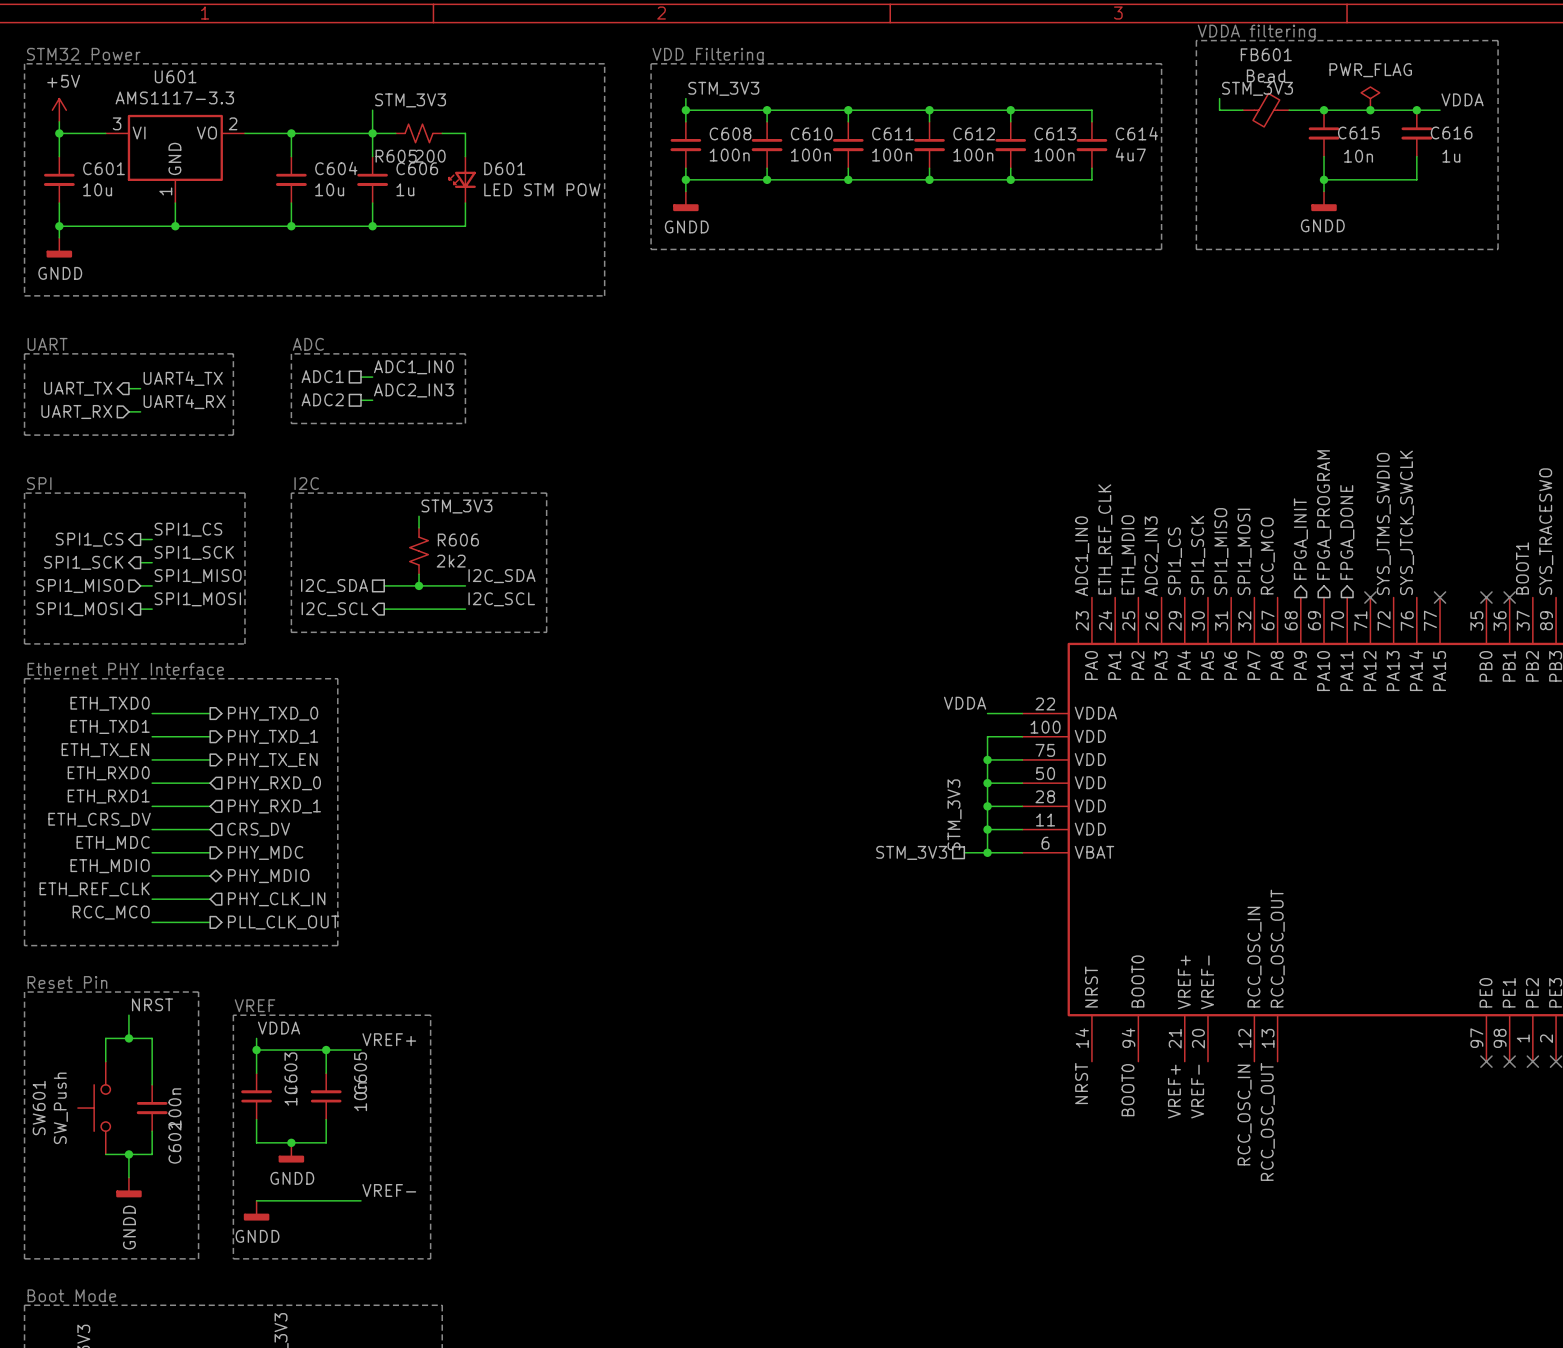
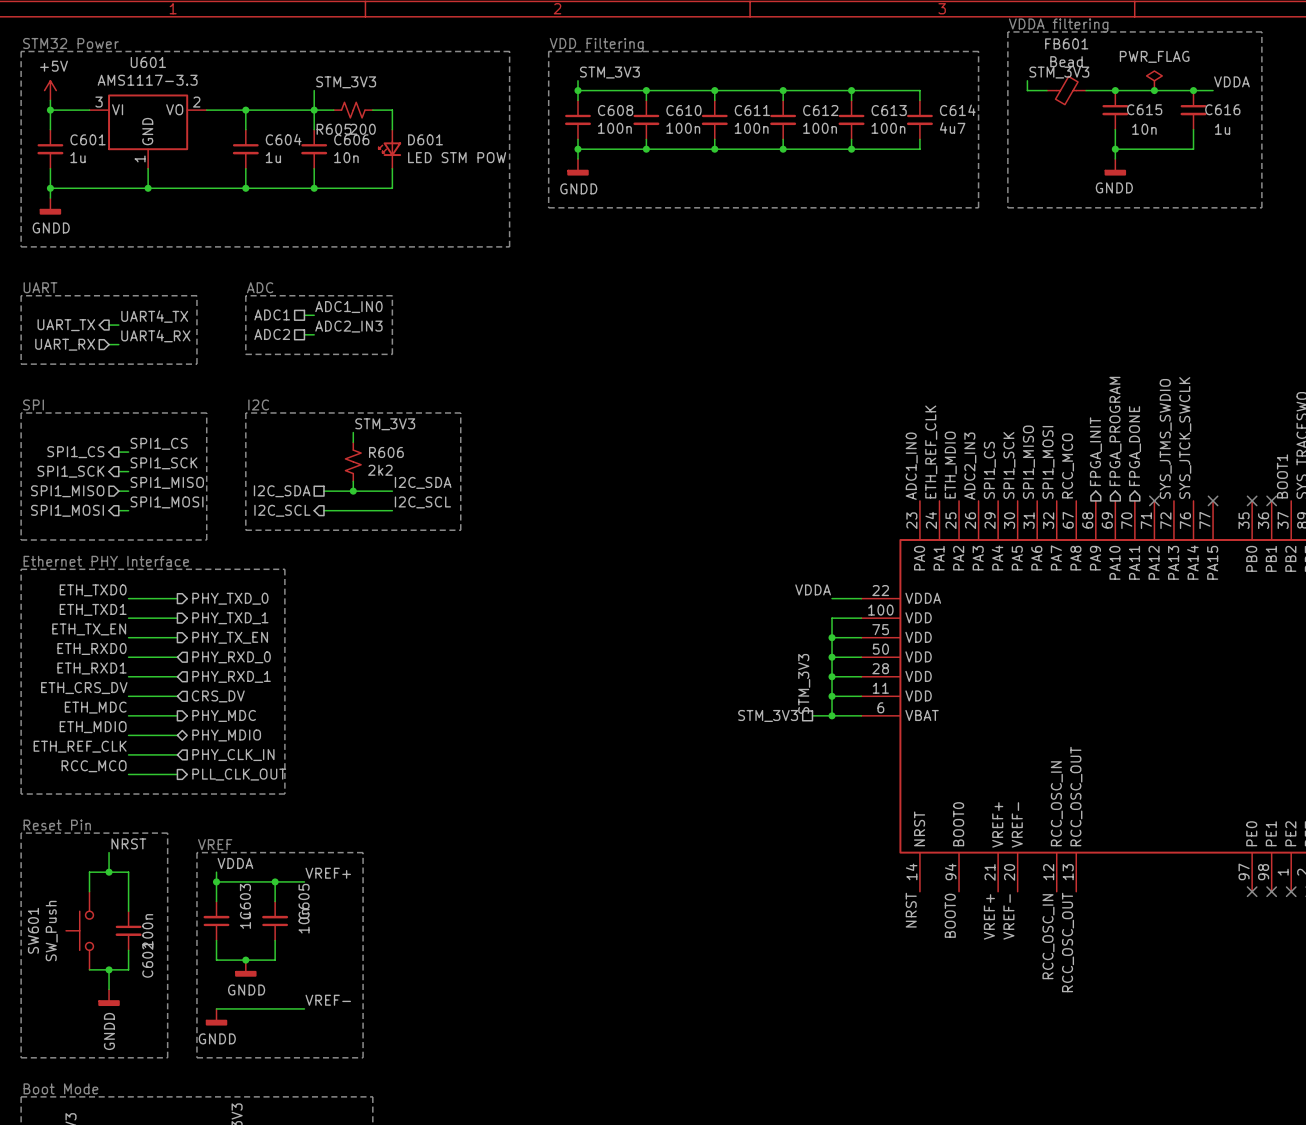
C601 value: 10u (97, 189) -> 1u (78, 157)
C604 value: 10u (329, 189) -> 1u (273, 157)
C606 value: 1u (405, 189) -> 10n (346, 157)

